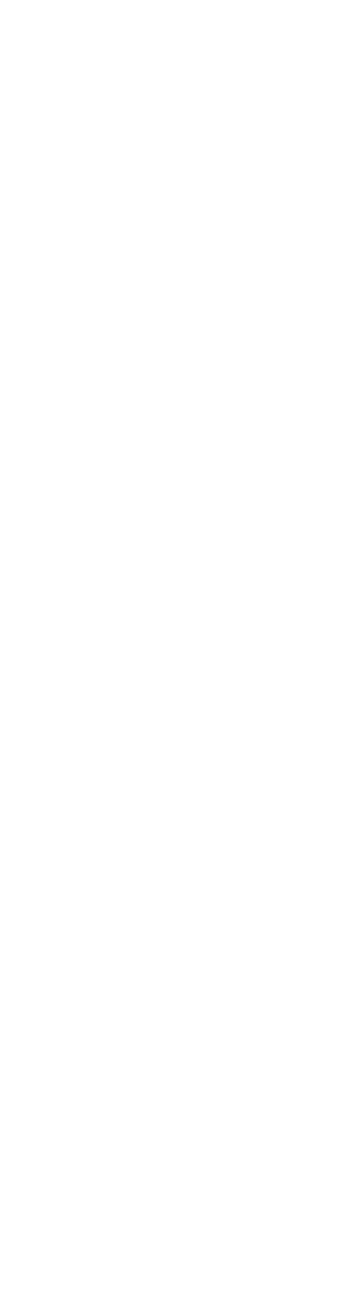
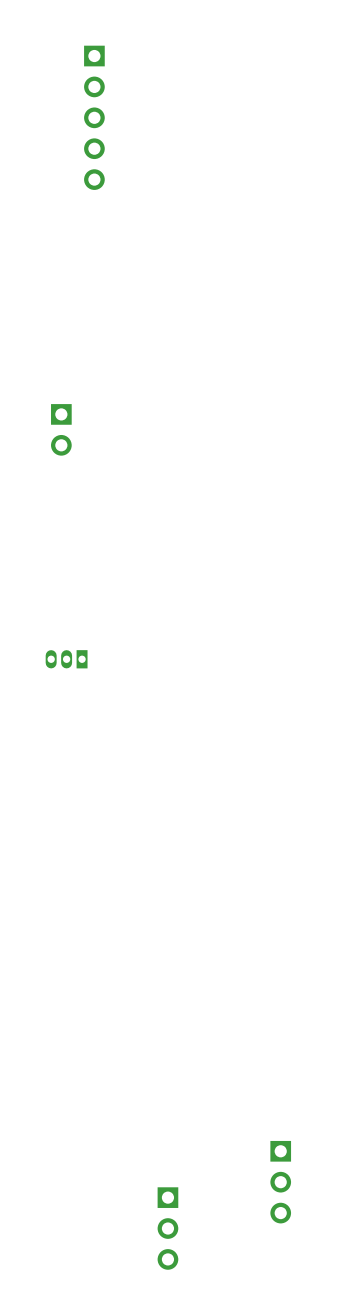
part: none -> (94, 117)
part: none -> (61, 429)
part: none -> (66, 659)
part: none -> (280, 1182)
part: none -> (167, 1228)

